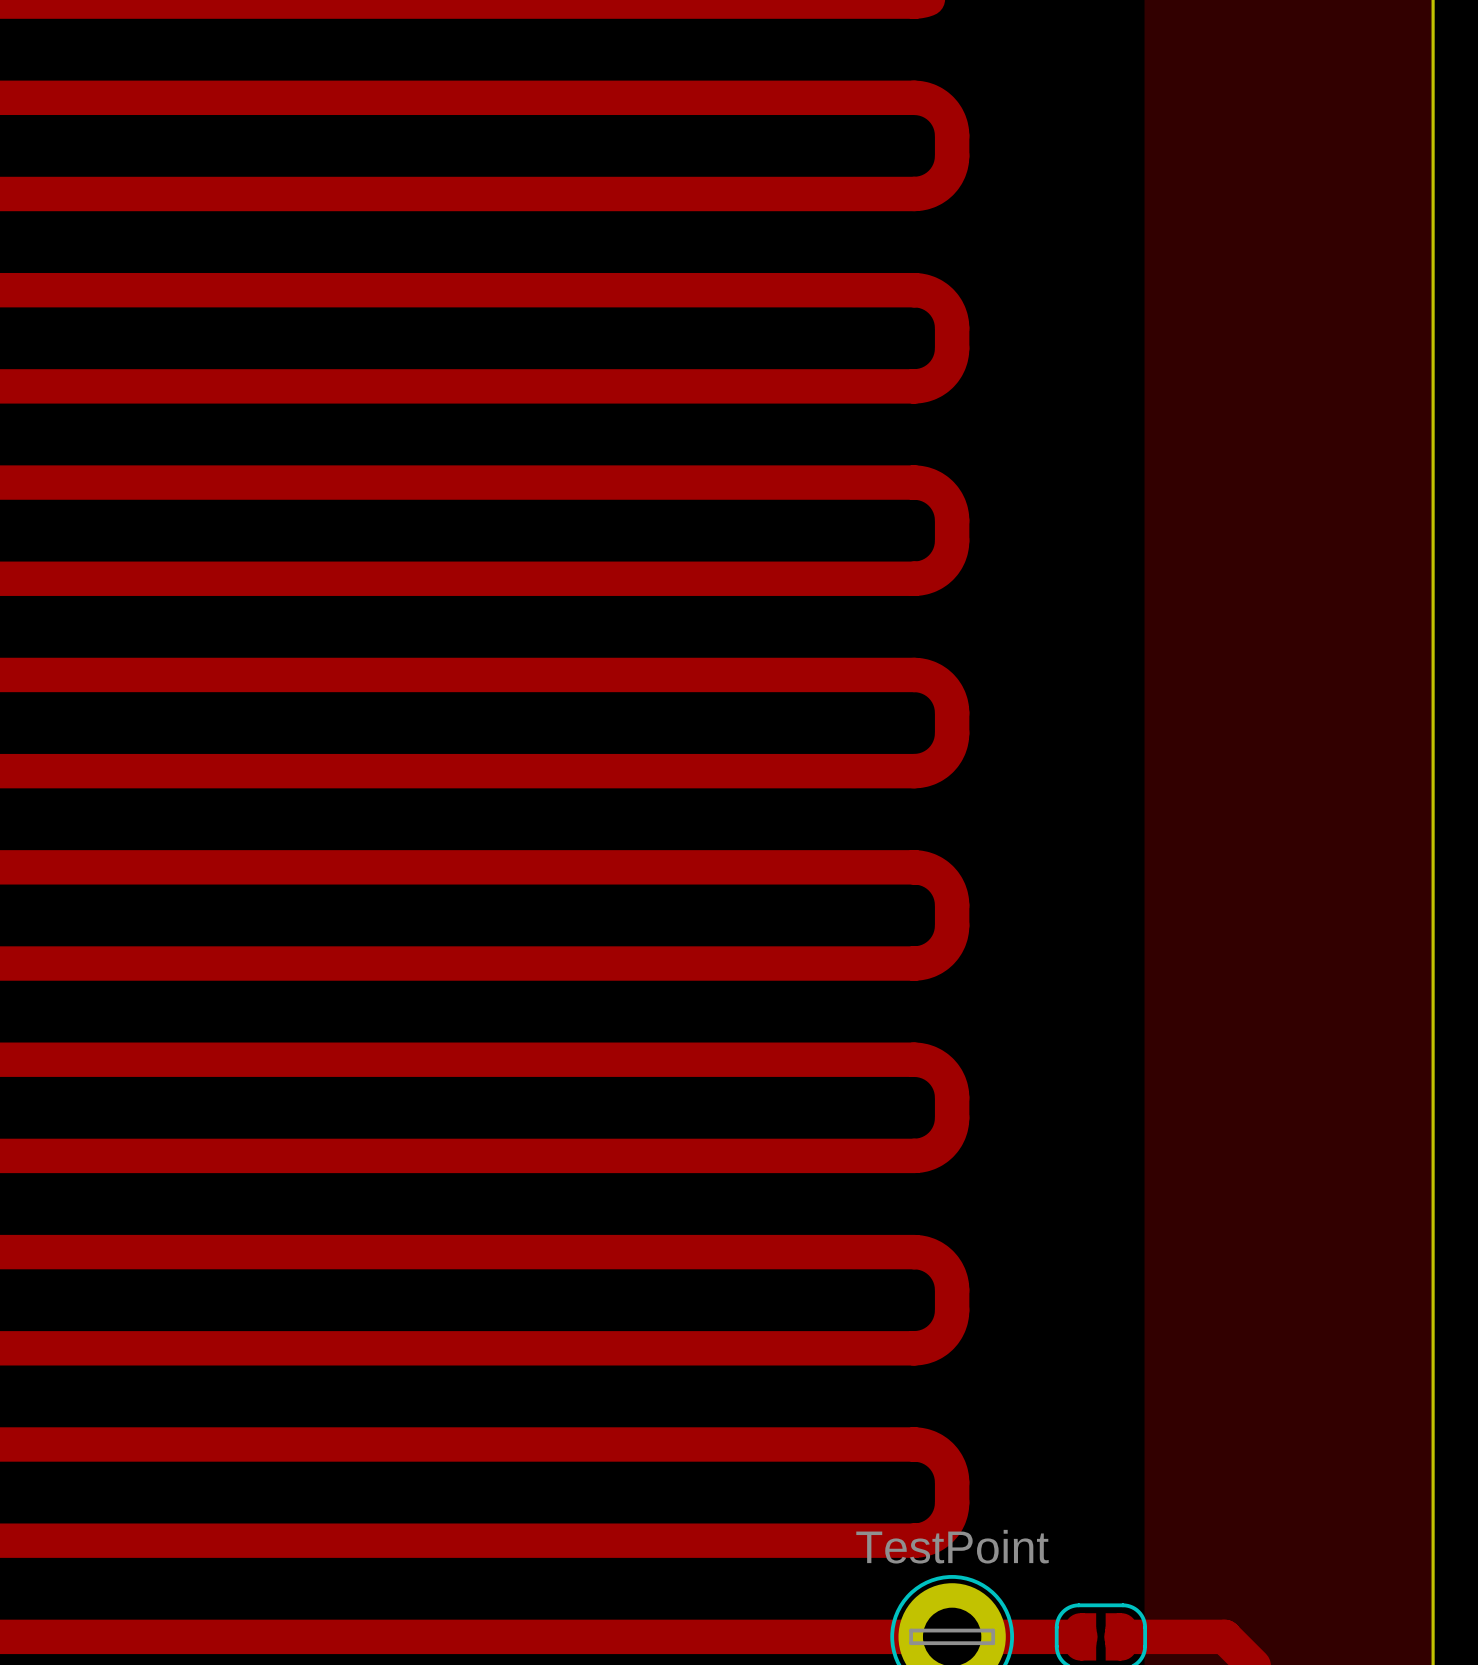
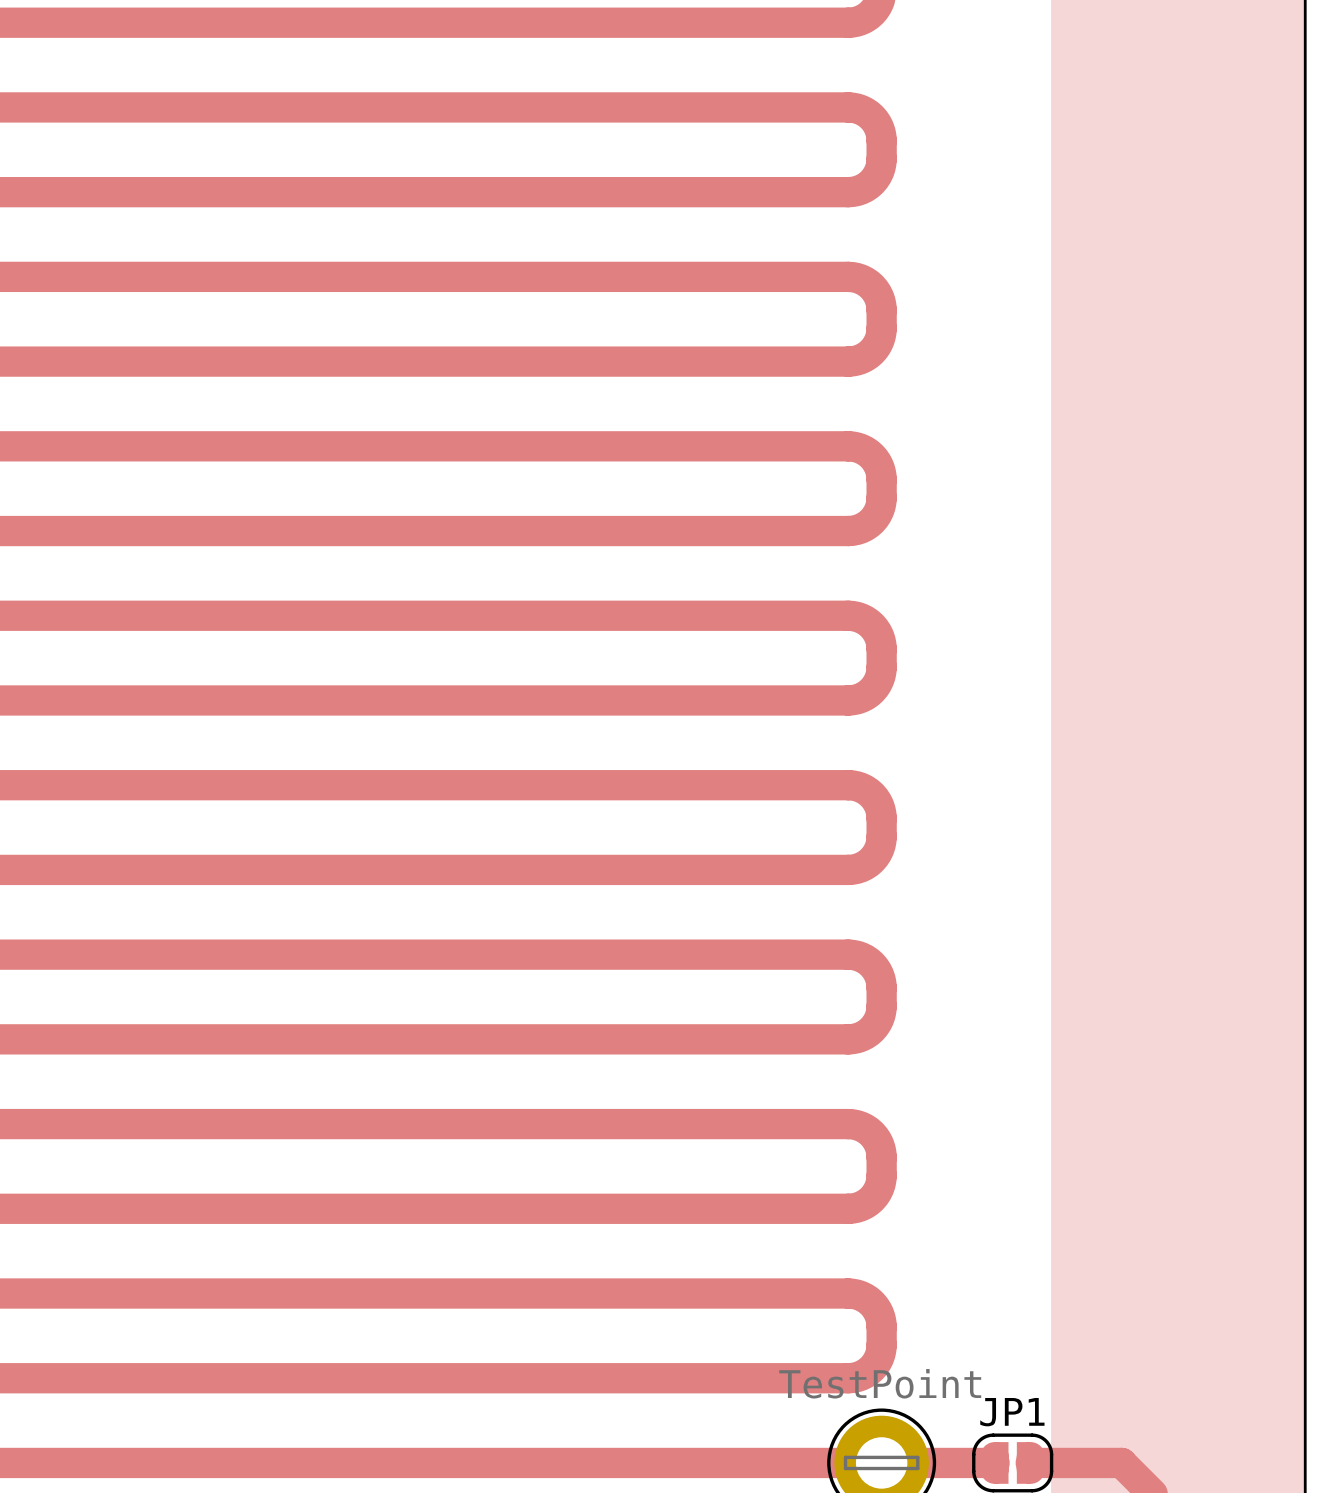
JP1 name: none -> JP1 (1012, 1412)

